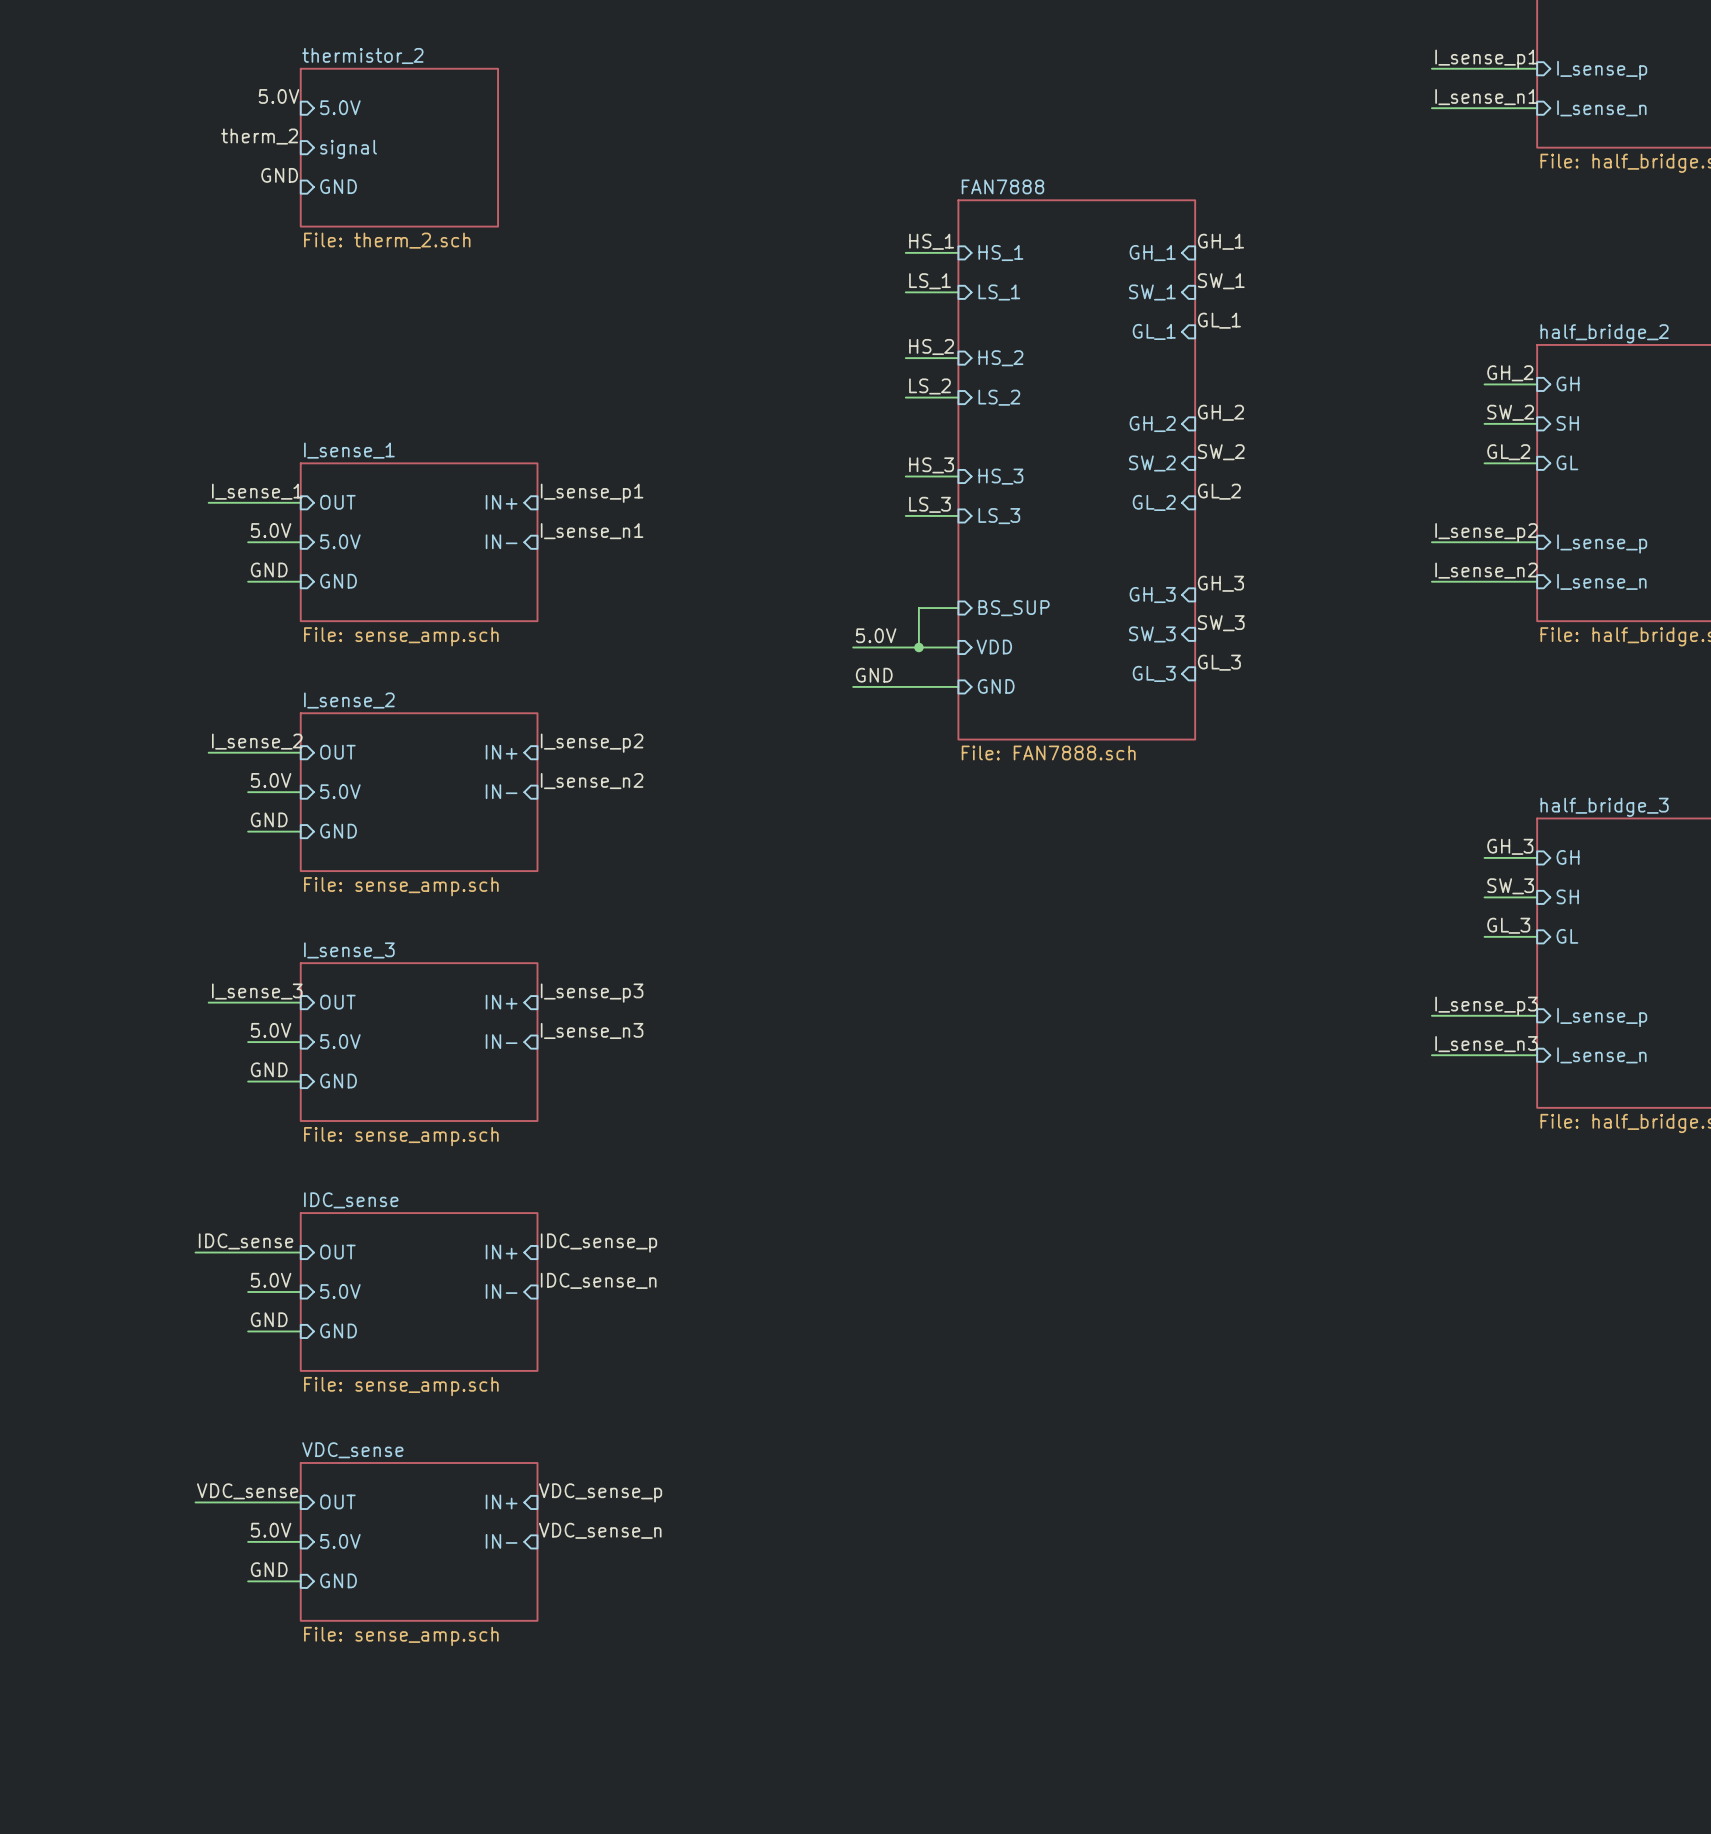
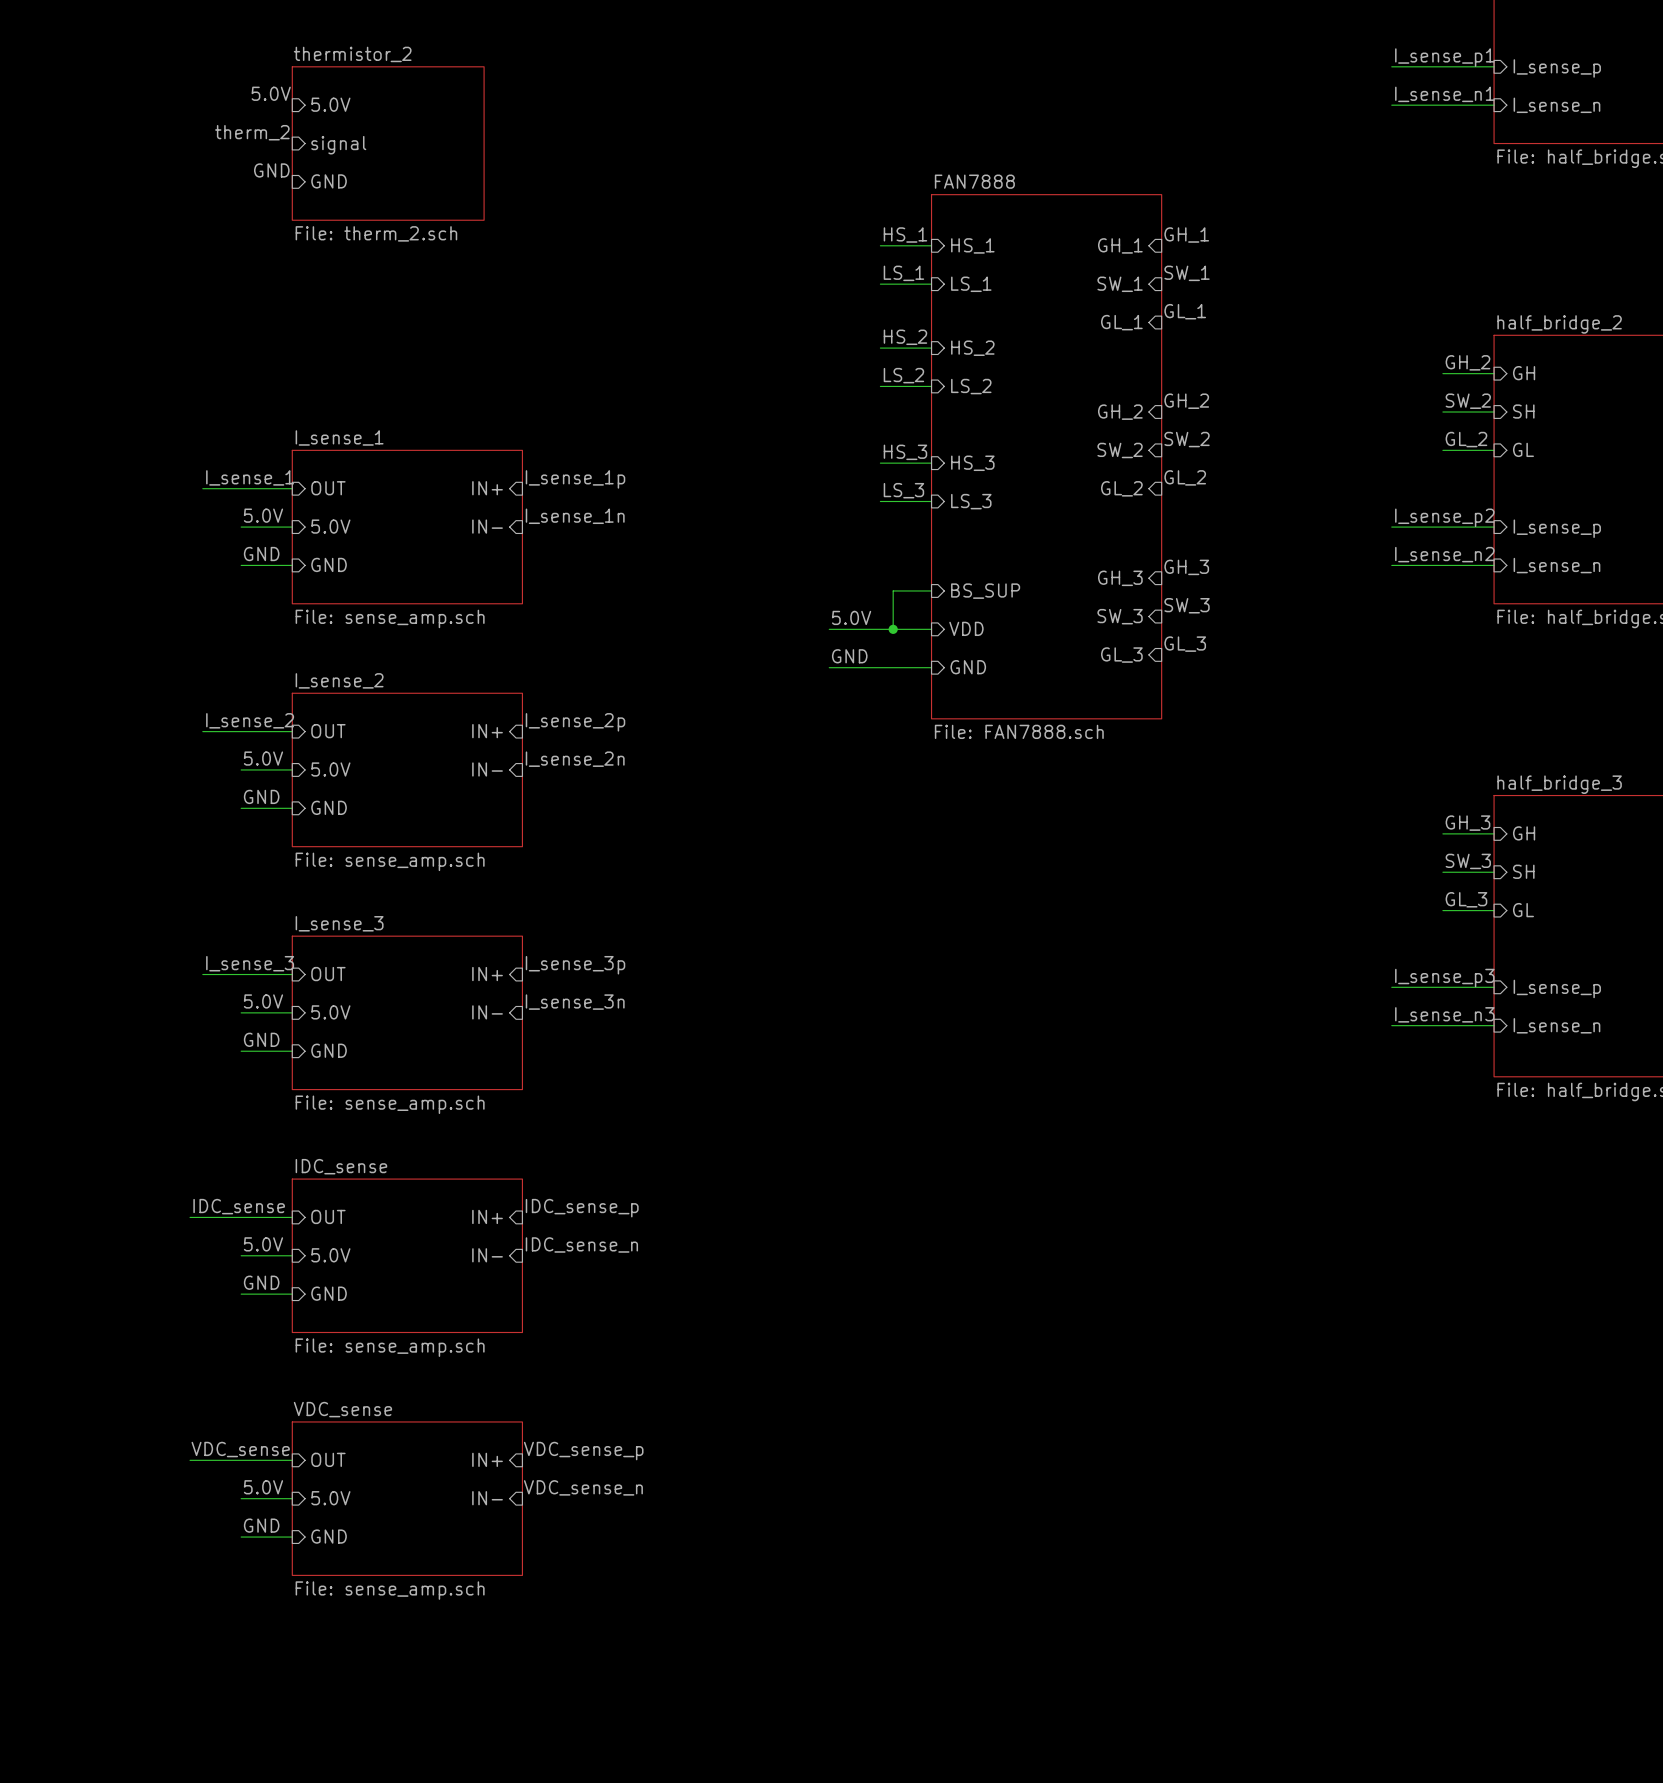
label: I_sense_p1 (592, 493) -> I_sense_1p (575, 479)
label: I_sense_n1 (592, 531) -> I_sense_1n (575, 516)
label: I_sense_p2 (592, 743) -> I_sense_2p (575, 722)
label: I_sense_n2 (592, 781) -> I_sense_2n (575, 759)
label: I_sense_p3 (592, 993) -> I_sense_3p (575, 965)
label: I_sense_n3 (592, 1030) -> I_sense_3n (575, 1002)

